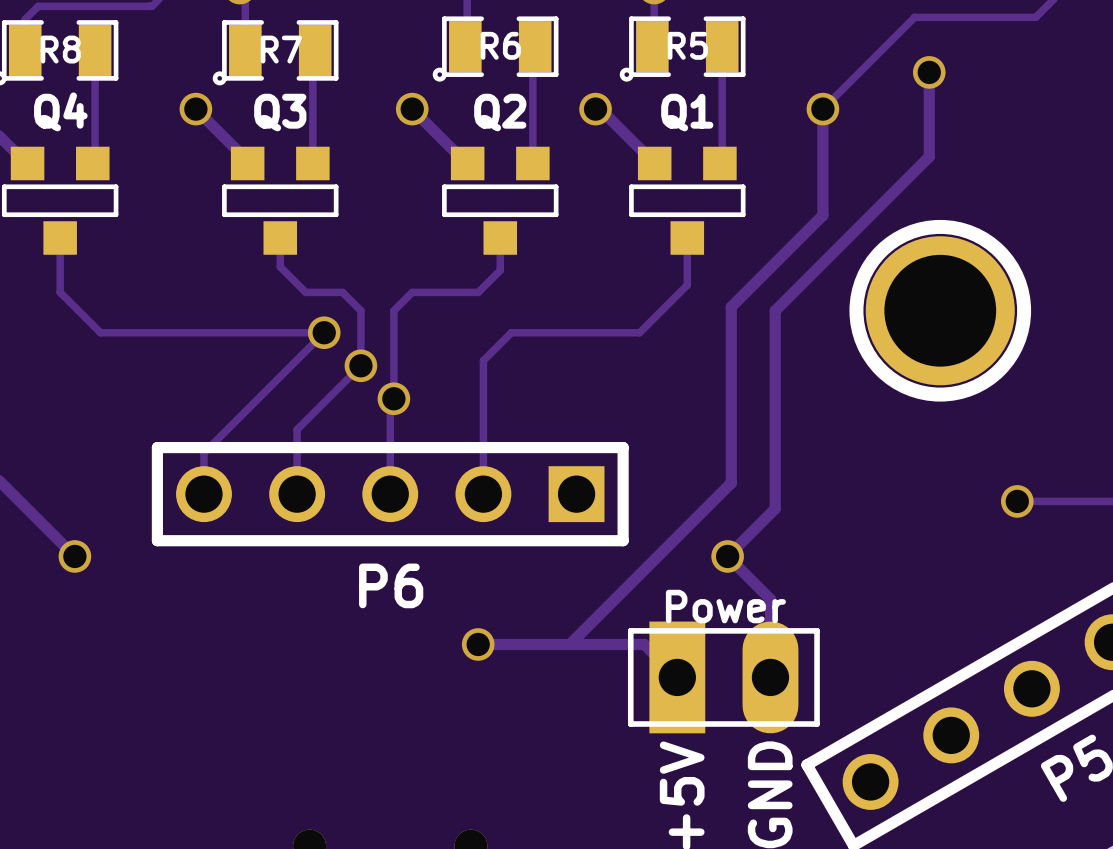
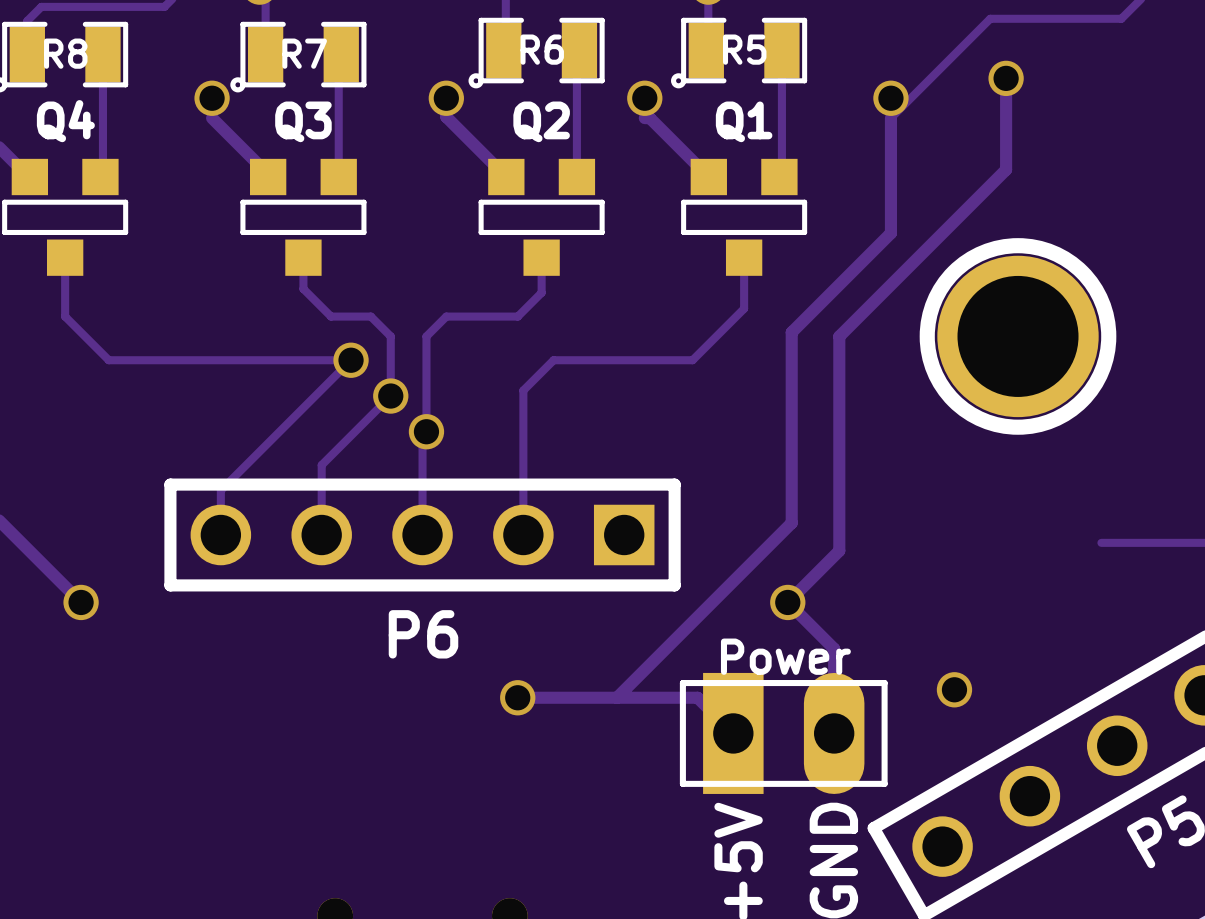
via position: (195, 109) -> (212, 98)
track: (412, 109) (466, 163) -> (446, 98) (446, 117) (506, 177)
via position: (412, 109) -> (446, 98)
via position: (595, 109) -> (644, 98)
via position: (822, 109) -> (890, 98)
via: (1017, 501) -> none
via: none -> (954, 689)

